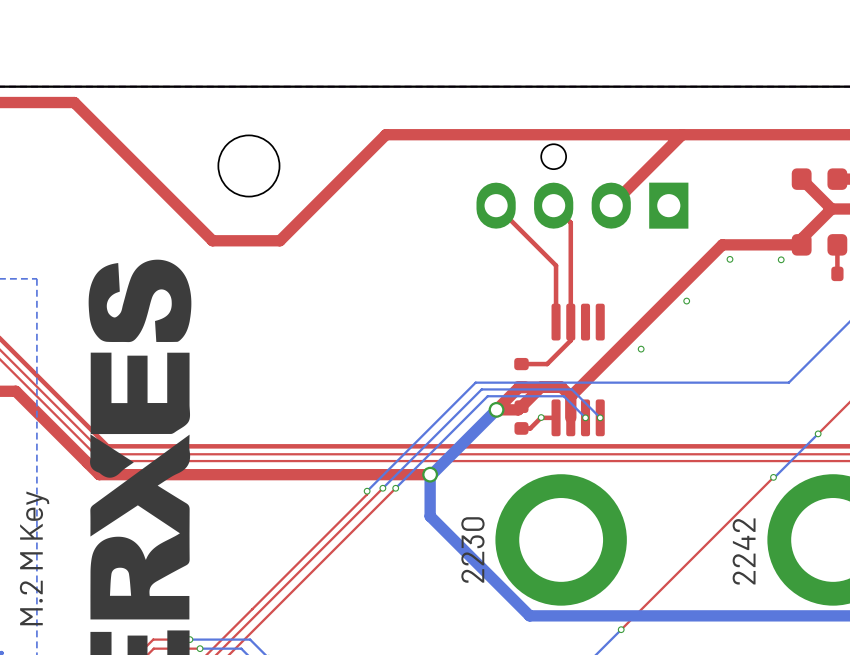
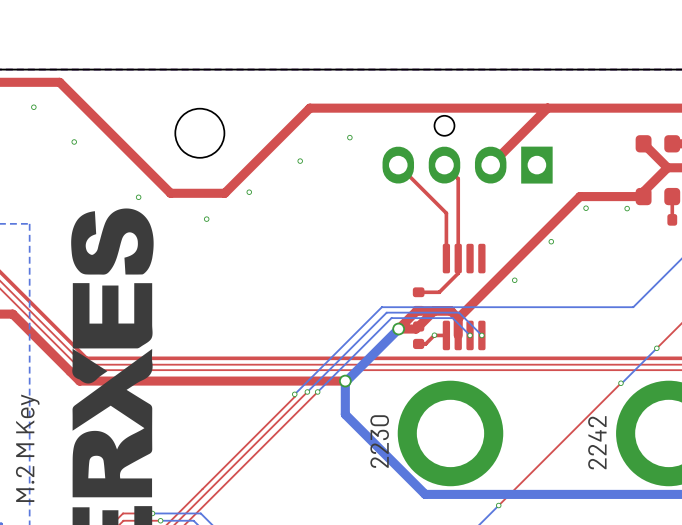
via: none -> (33, 107)
via: none -> (349, 137)
via: none -> (74, 141)
via: none -> (300, 161)
via: none -> (249, 192)
via: none -> (138, 197)
via: none -> (206, 219)

